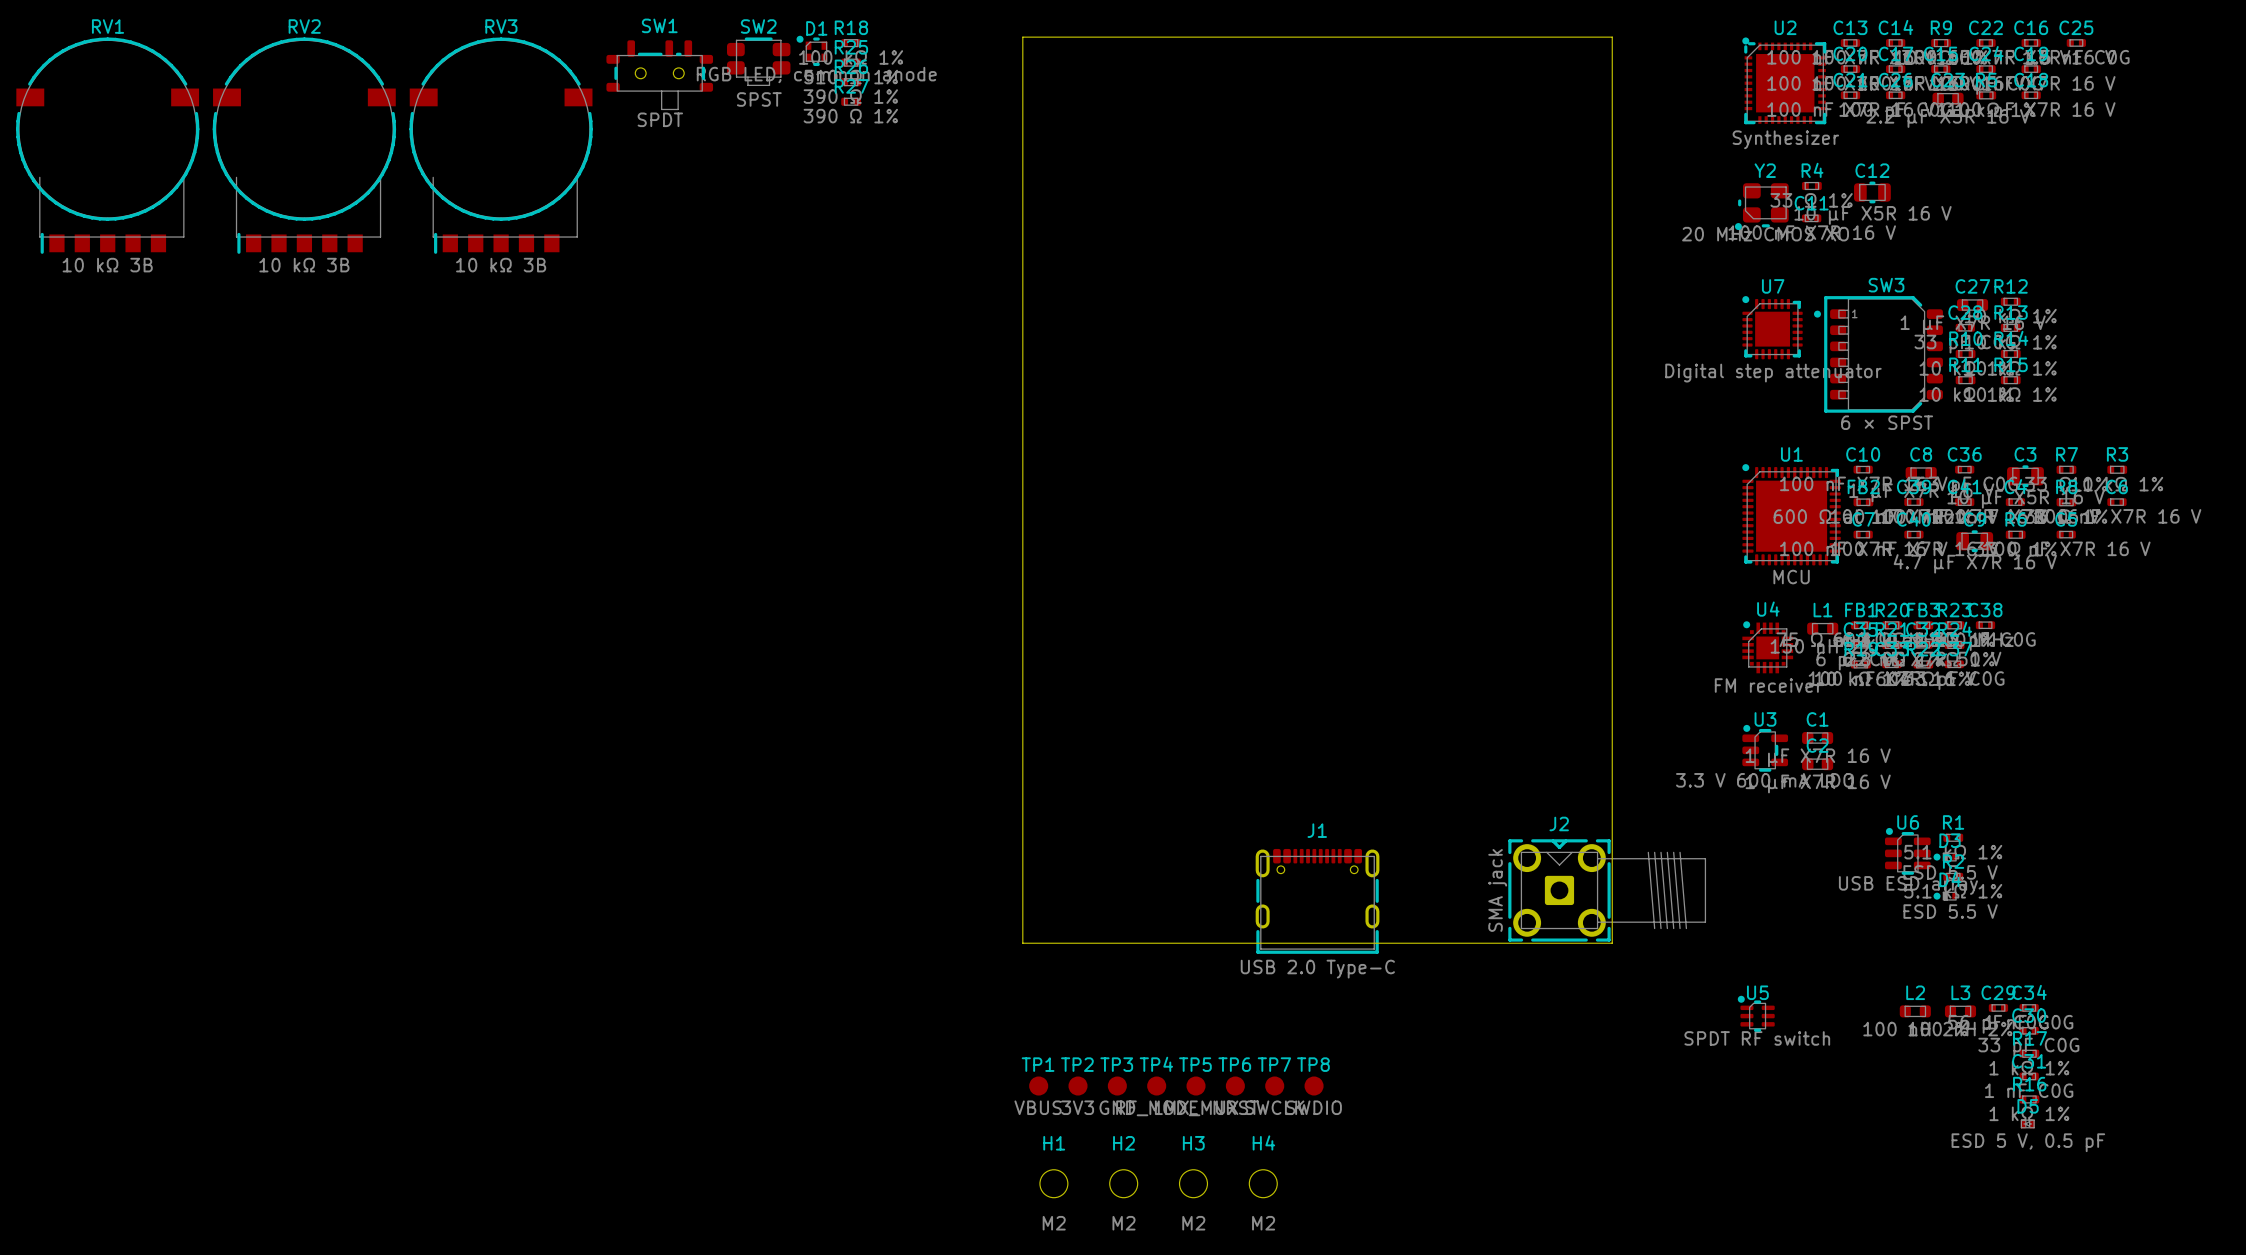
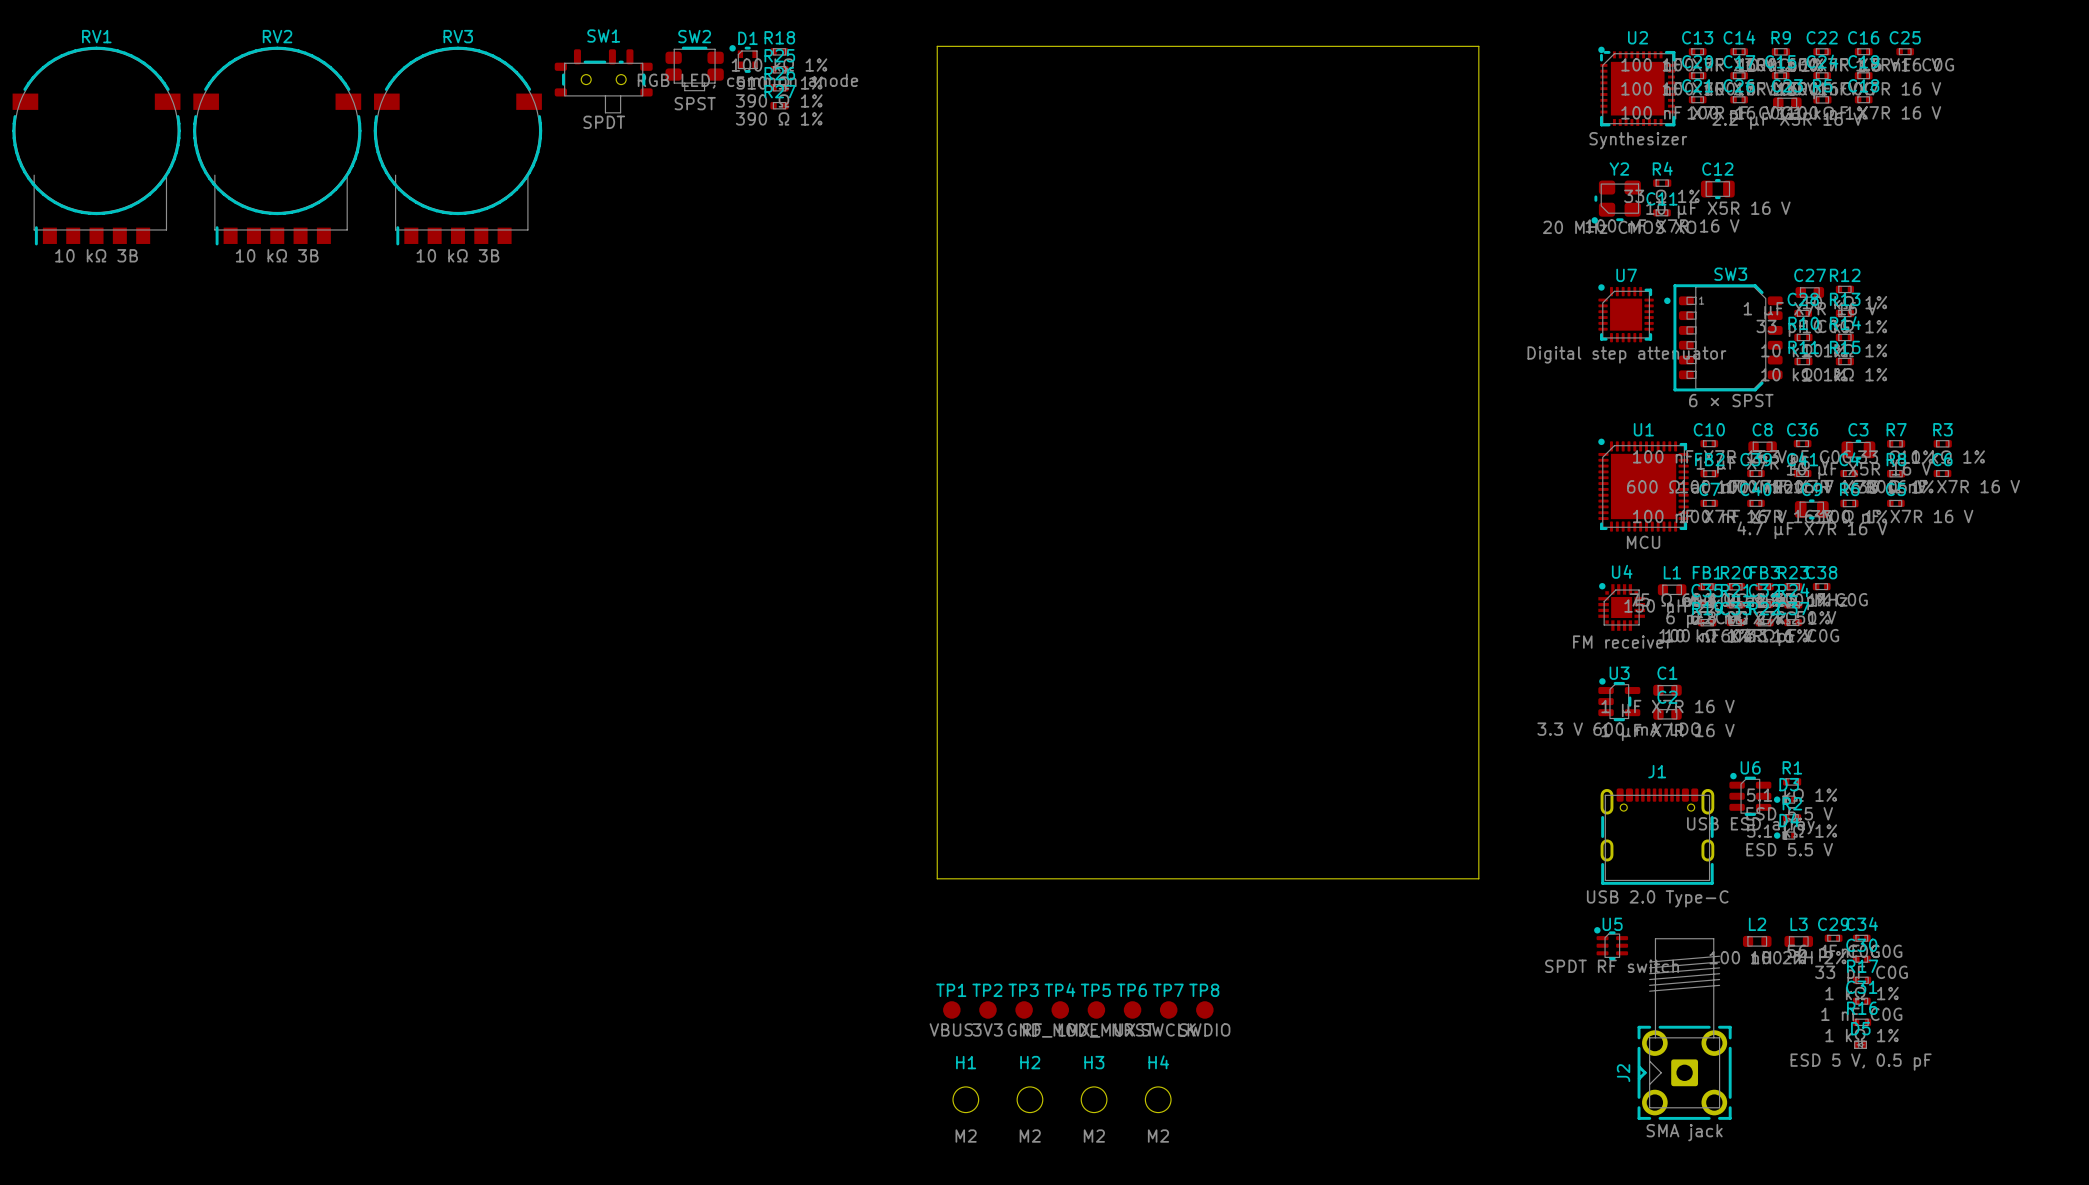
J2 rotation: 0° (1607, 890) -> 90° counterclockwise (1684, 1029)
J2 position: (1607, 890) -> (1684, 1029)
J1 position: (1317, 901) -> (1657, 836)

